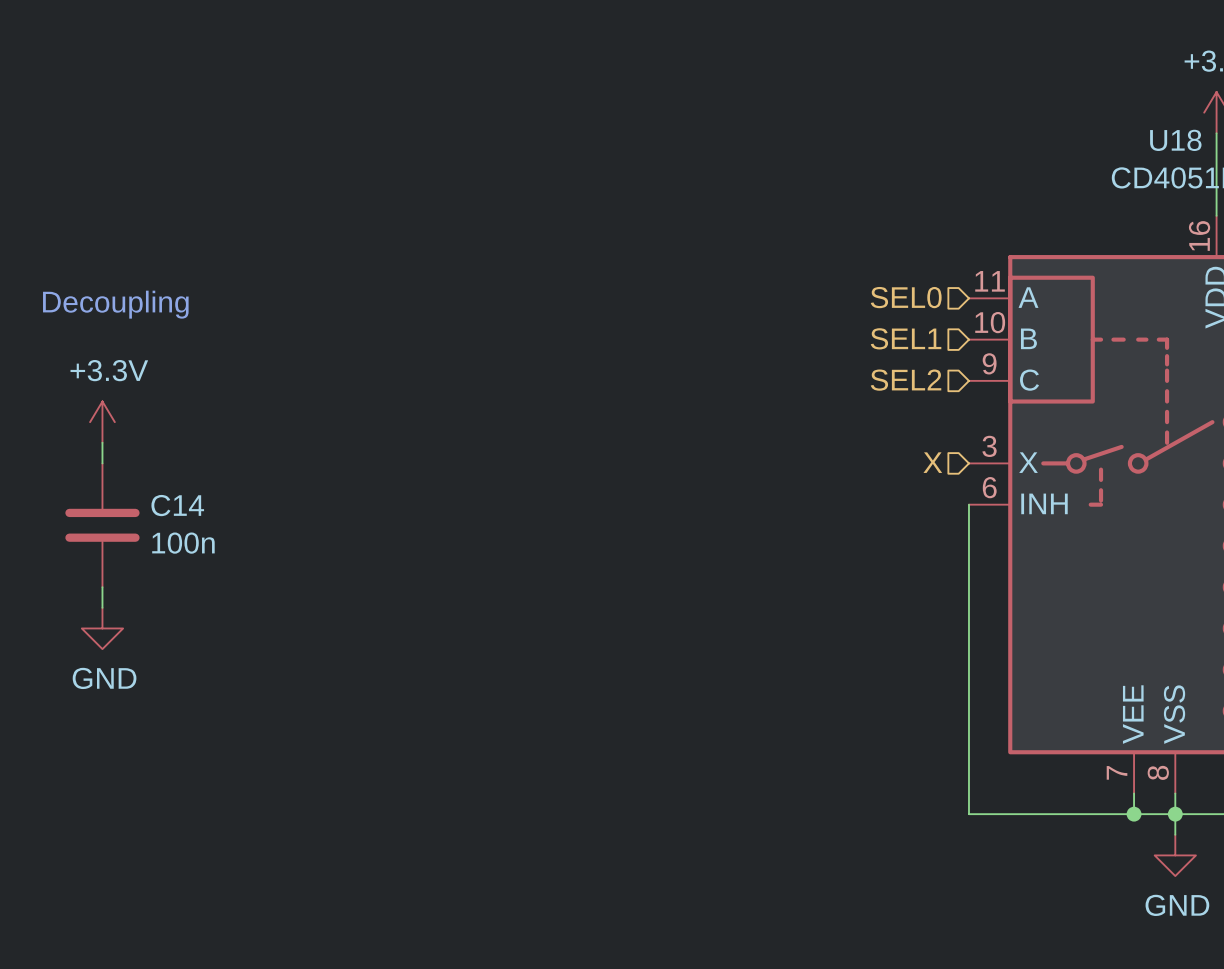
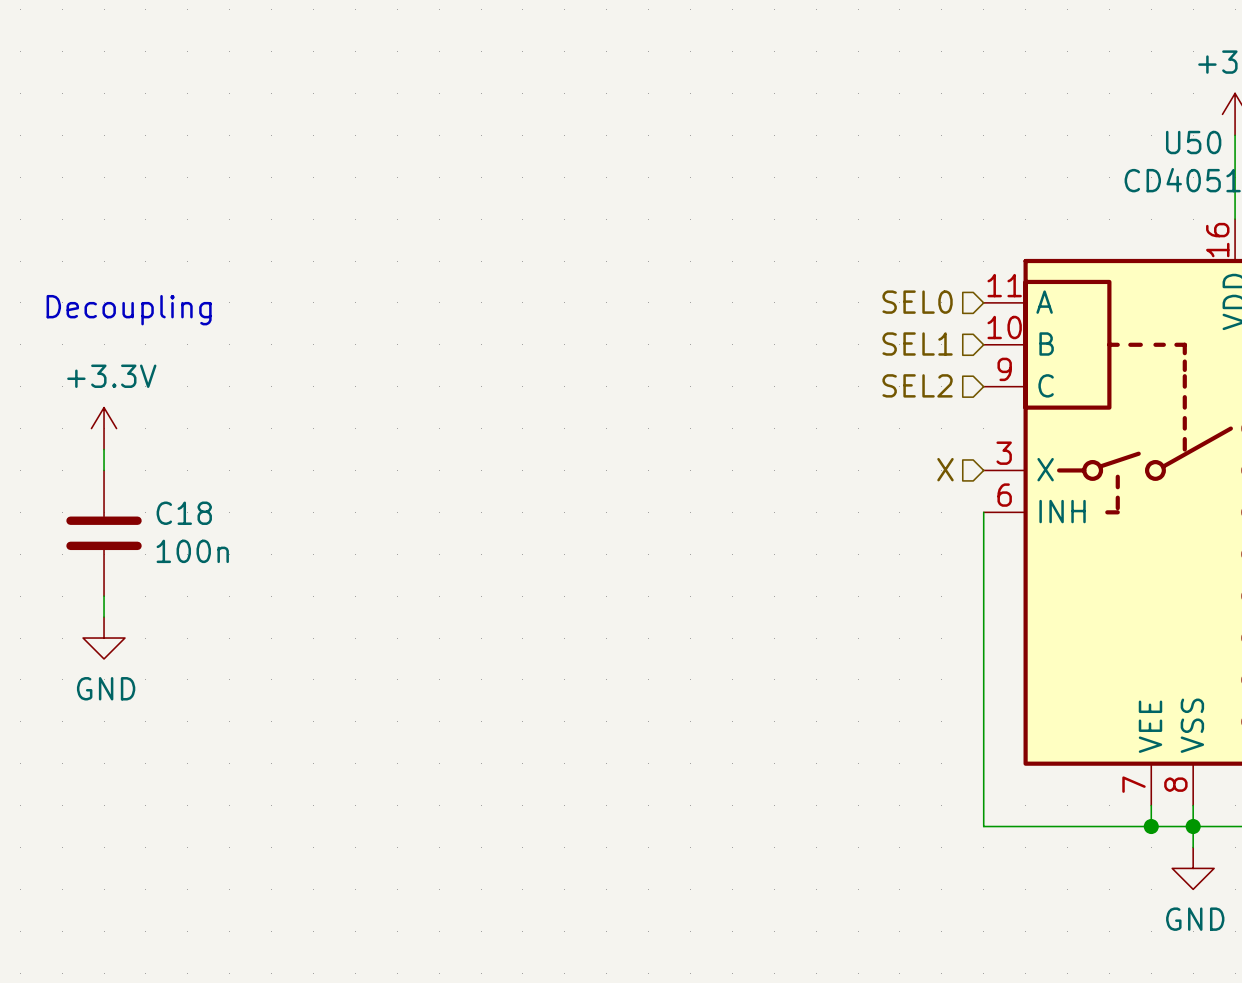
U18 name: U18 (1175, 140) -> U50 (1193, 142)
C14 name: C14 (177, 505) -> C18 (184, 513)

